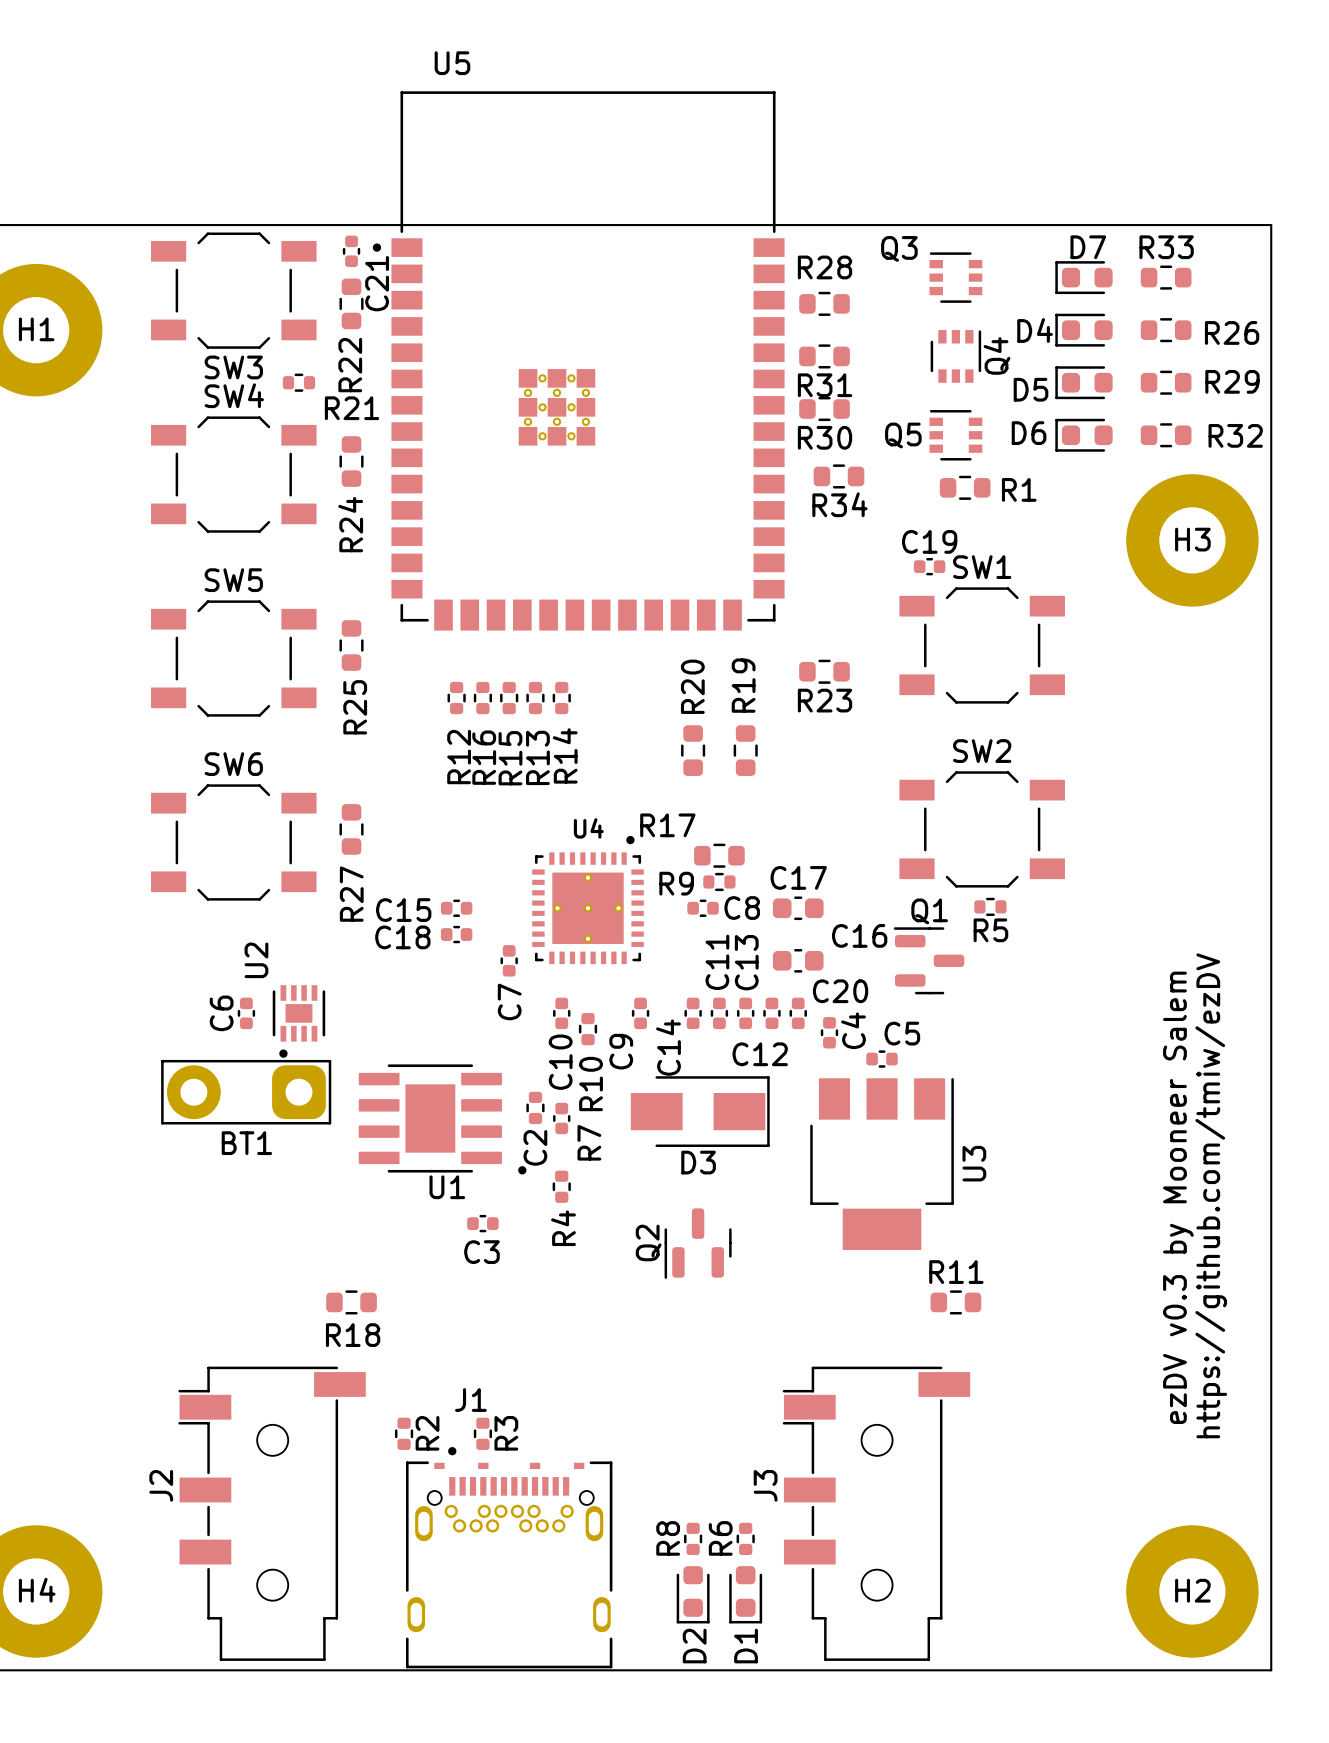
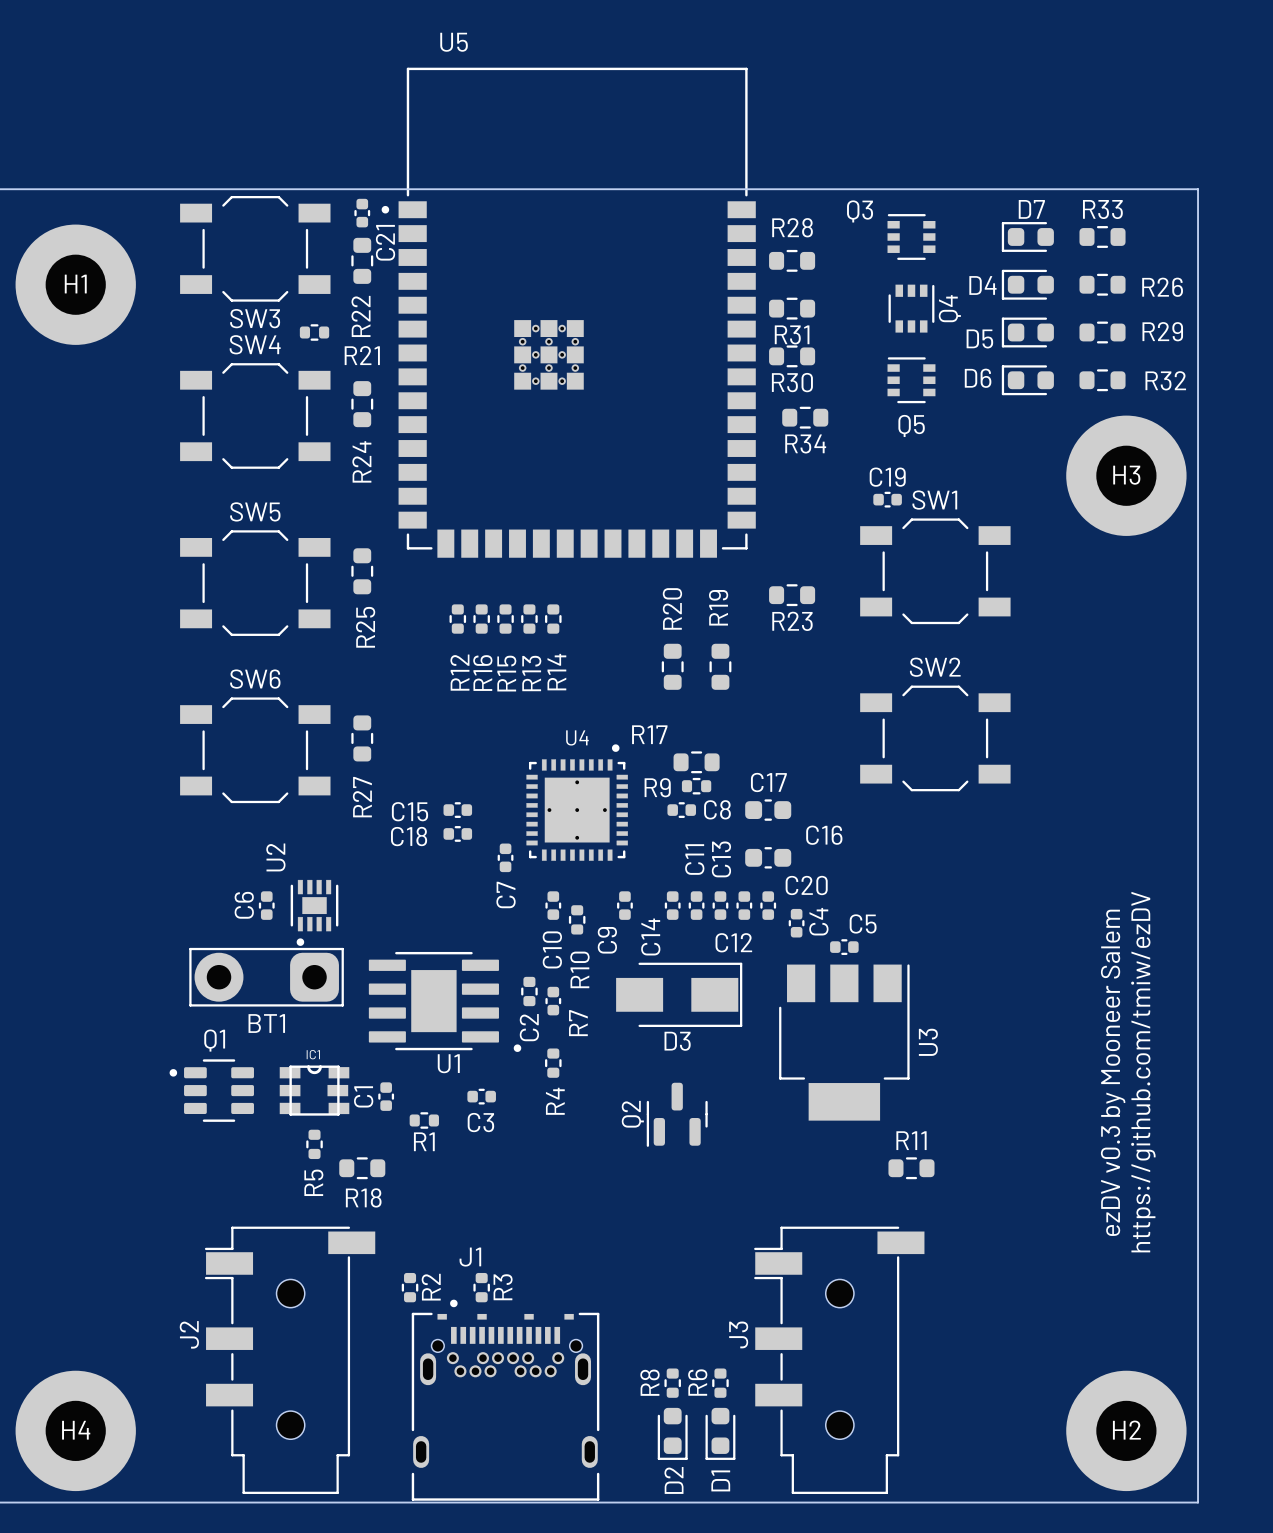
Q5 name position: Q5 (903, 435) -> Q5 (911, 425)
R1 footprint: [939, 475, 991, 500] -> [409, 1112, 439, 1129]
R1 name position: R1 (1019, 489) -> R1 (424, 1141)
R5 rotation: 0° (990, 906) -> 90° clockwise (314, 1144)
R5 position: (990, 906) -> (314, 1144)
Q1 footprint: [893, 927, 965, 995] -> [169, 1059, 254, 1122]
IC1: none -> (314, 1090)
C1: none -> (386, 1096)

